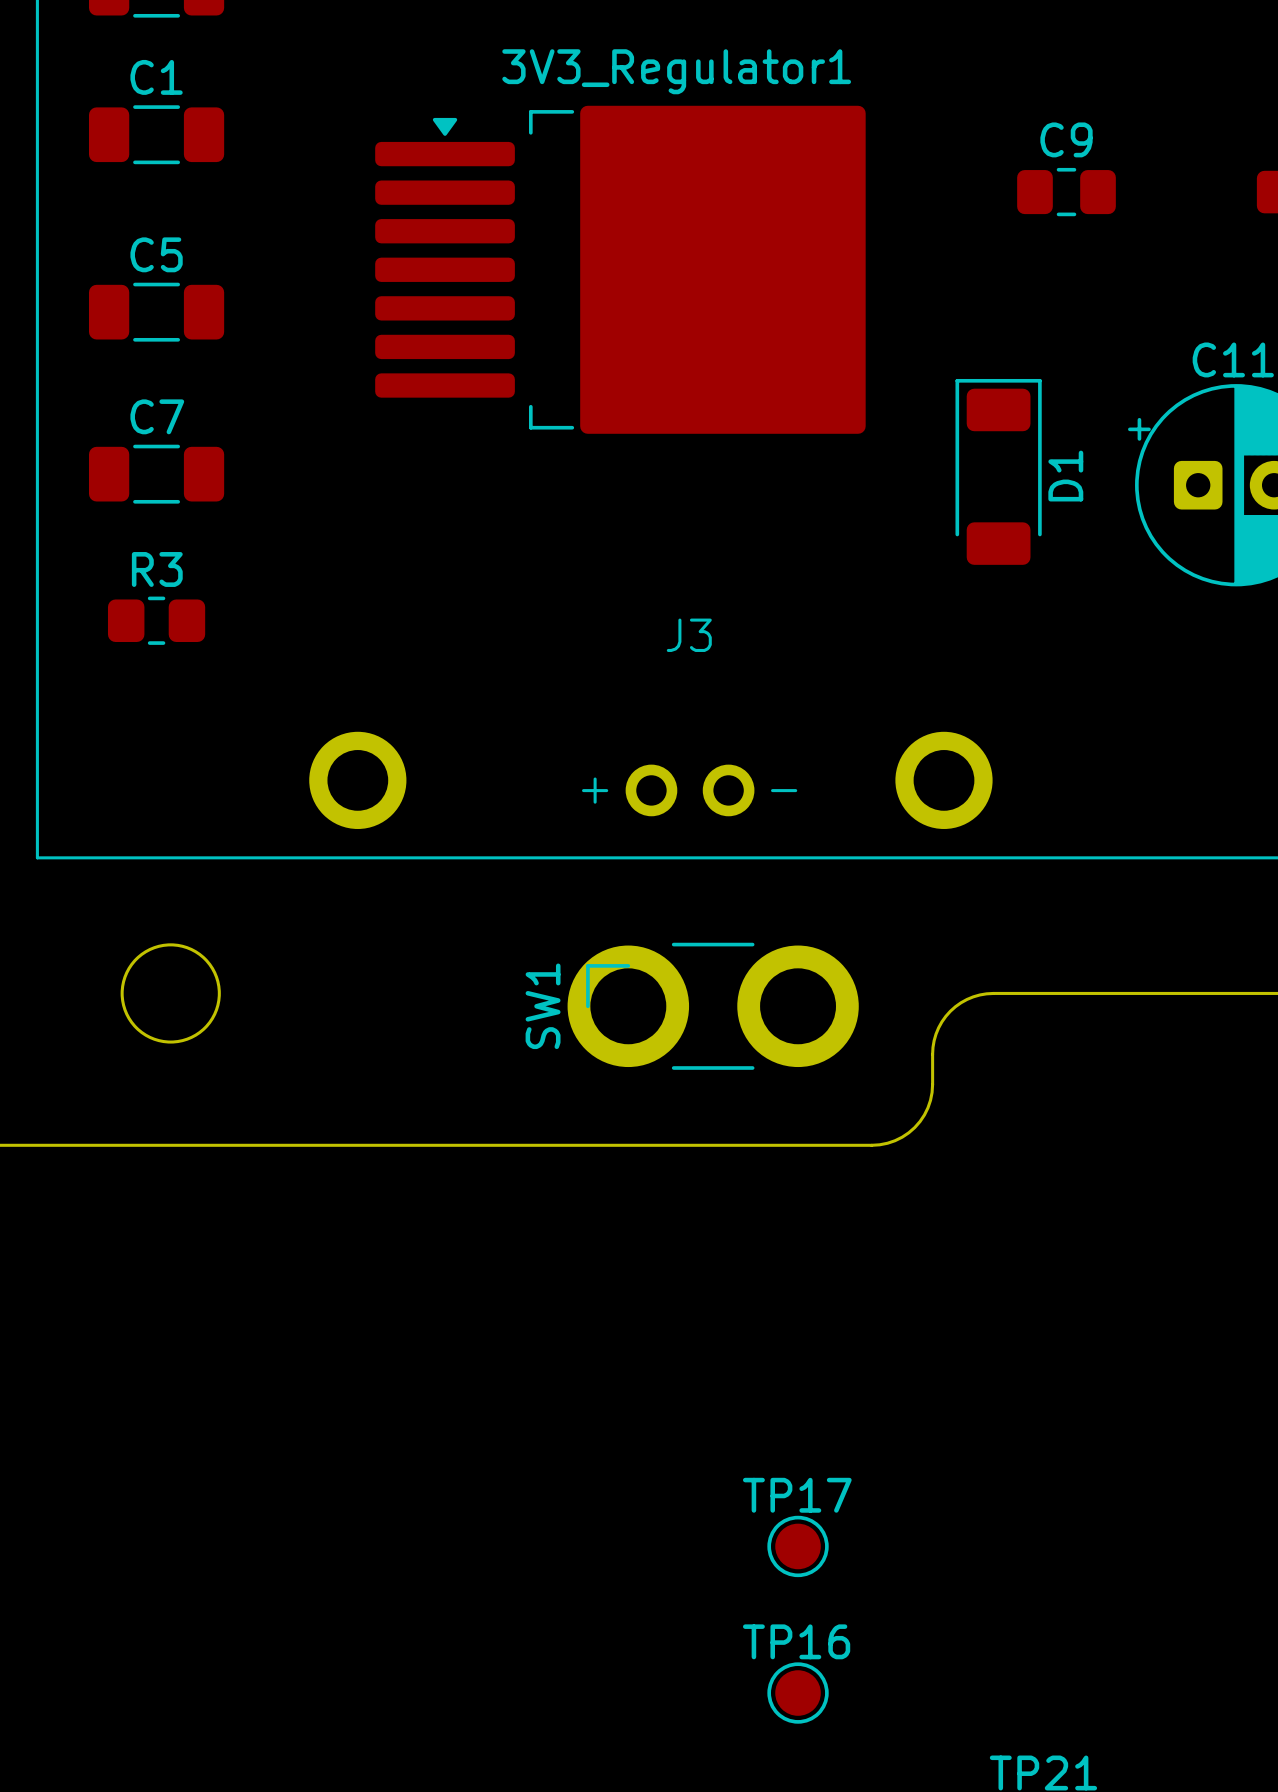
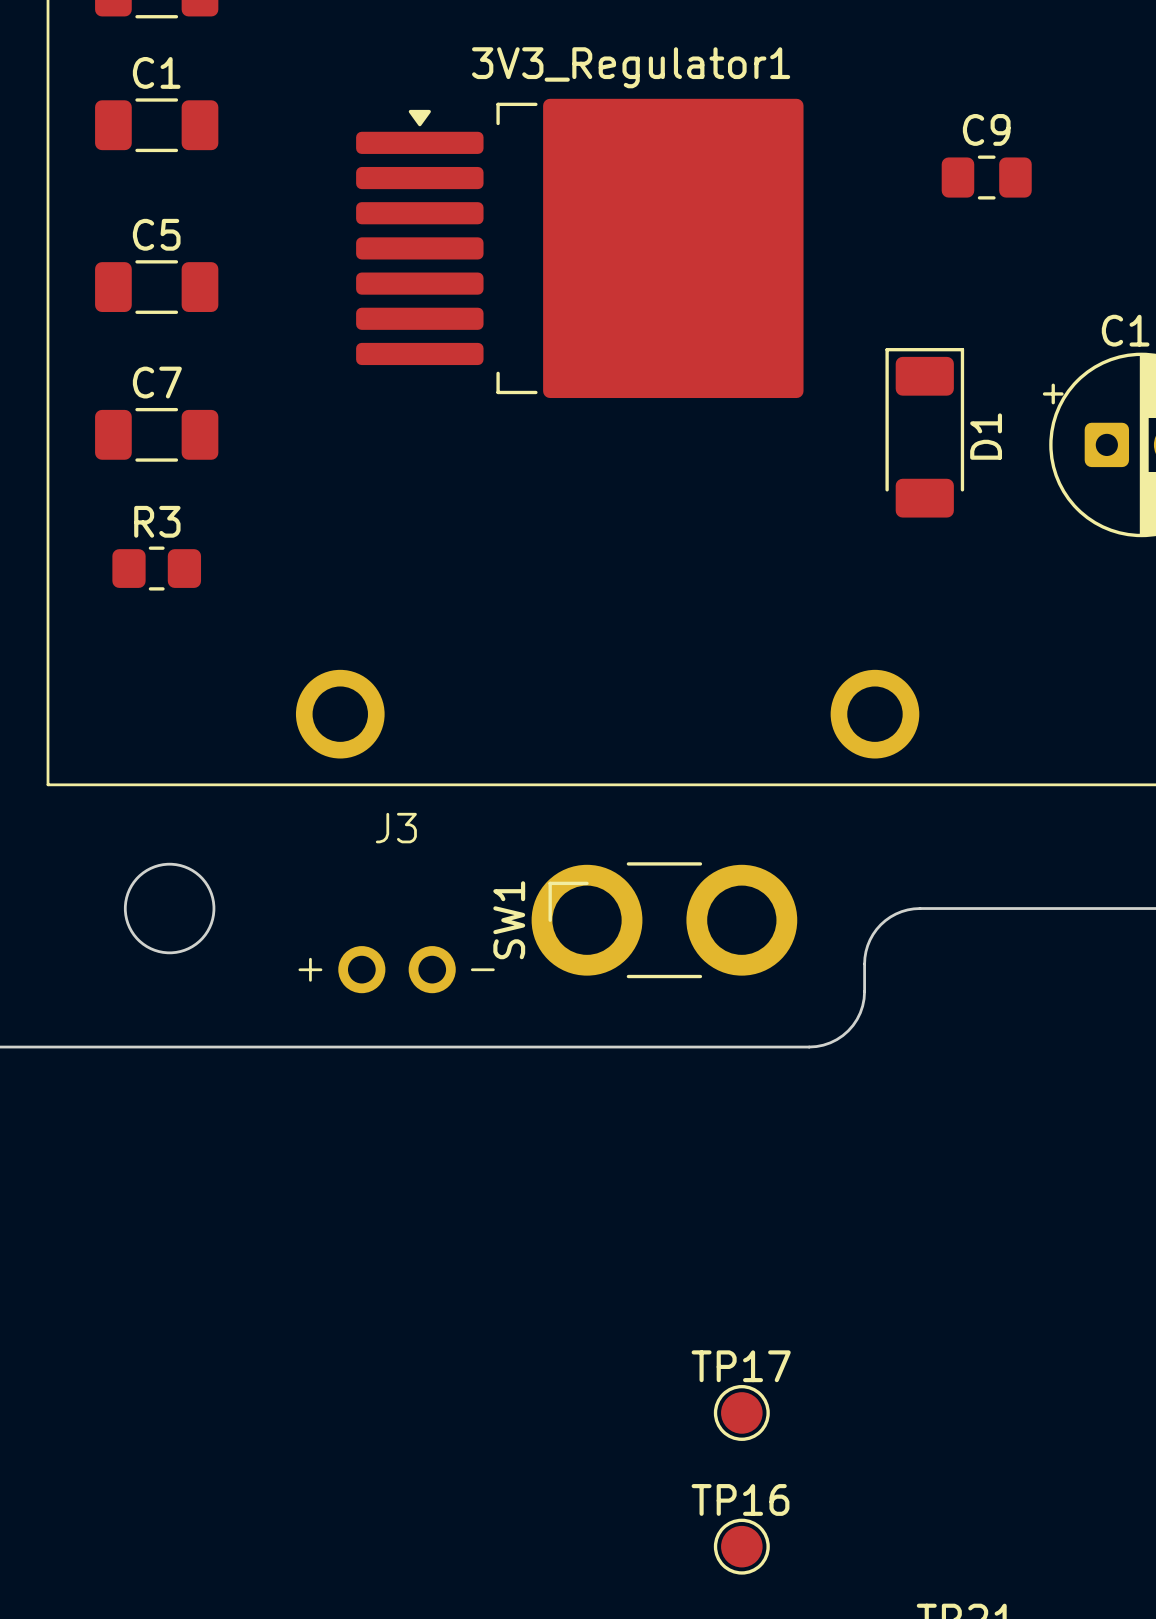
J3 position: (690, 790) -> (397, 969)

